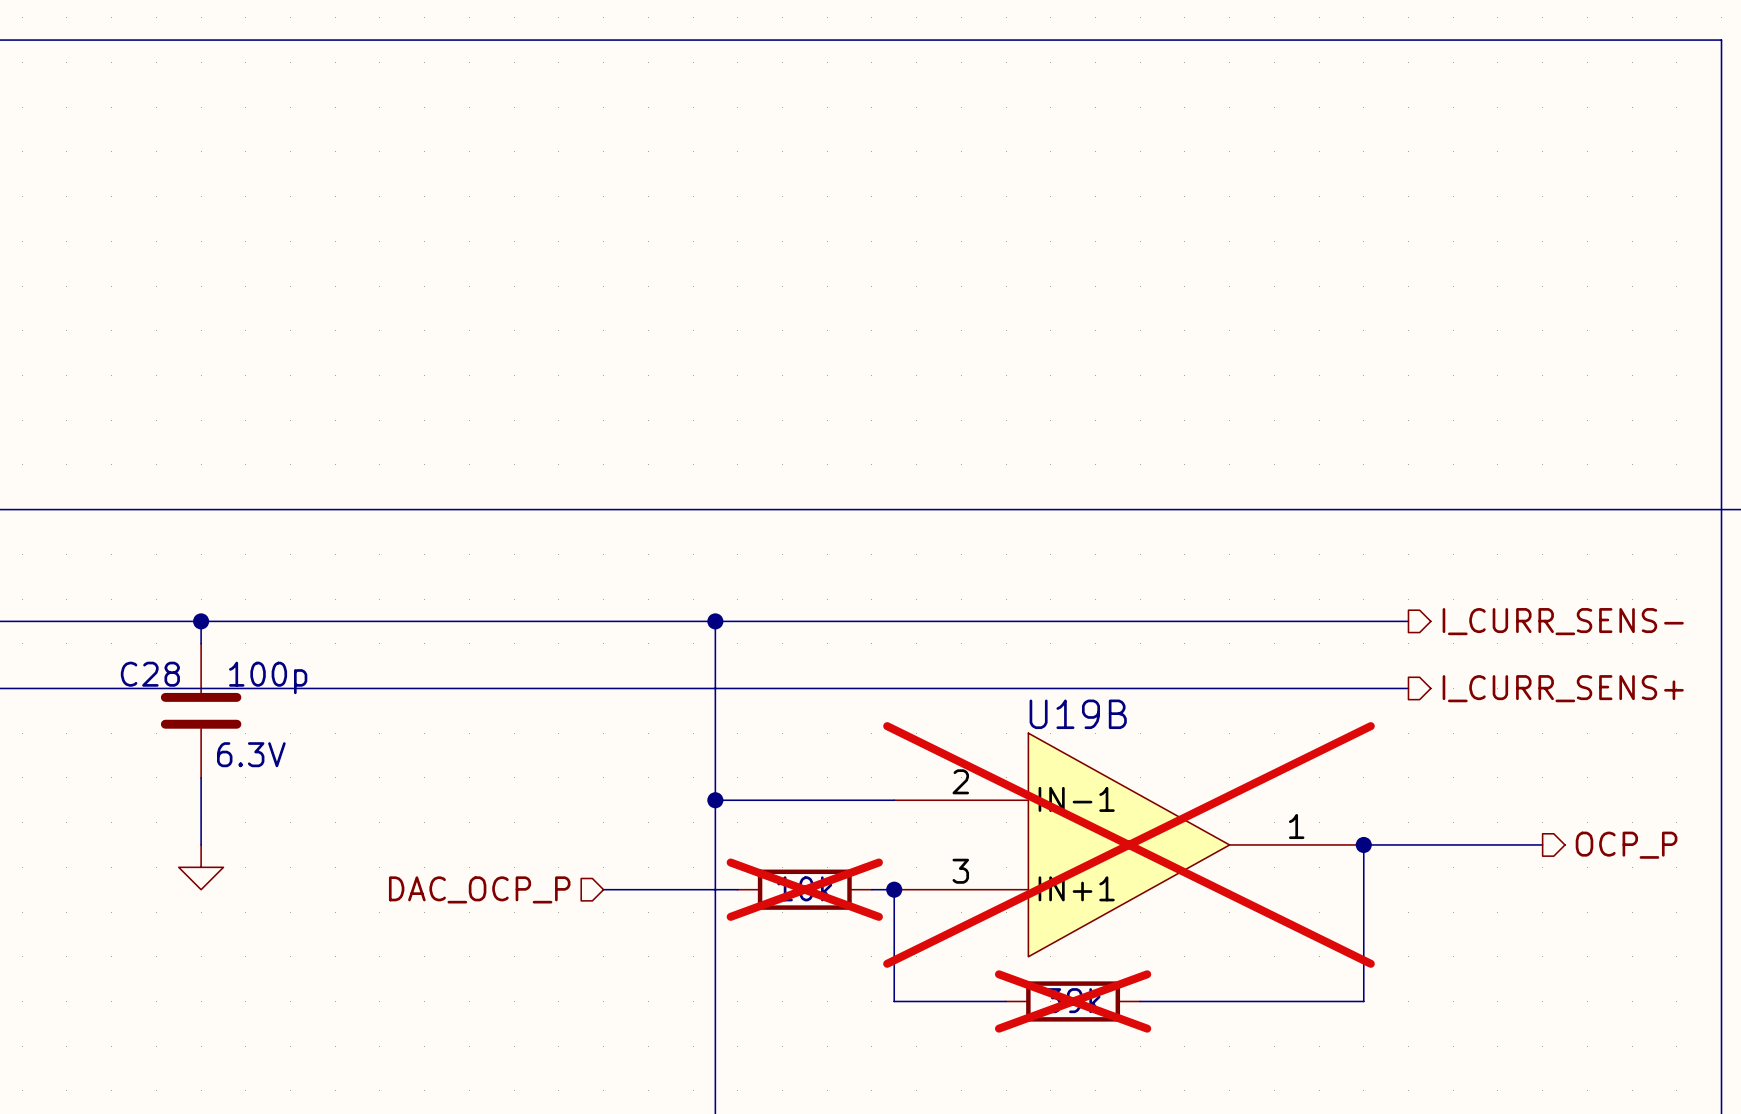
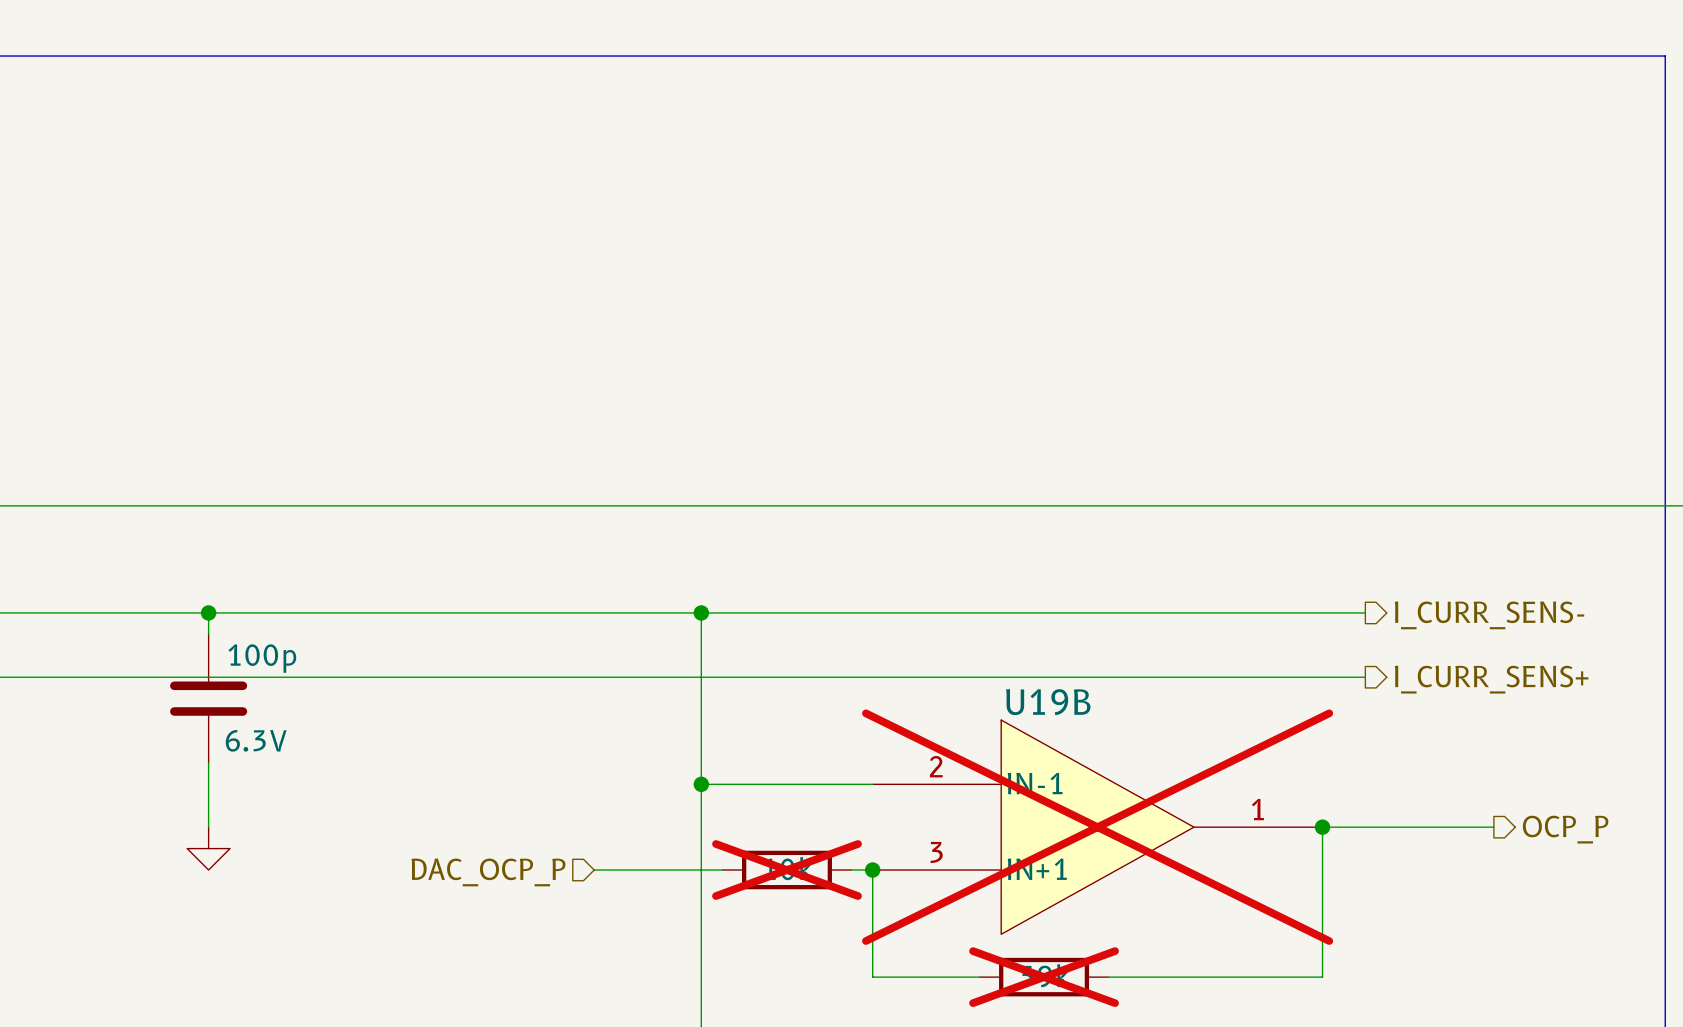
C28 value: none -> 100p (262, 658)
C28 name: C28 (150, 674) -> none
C28 text: 100p (268, 677) -> none

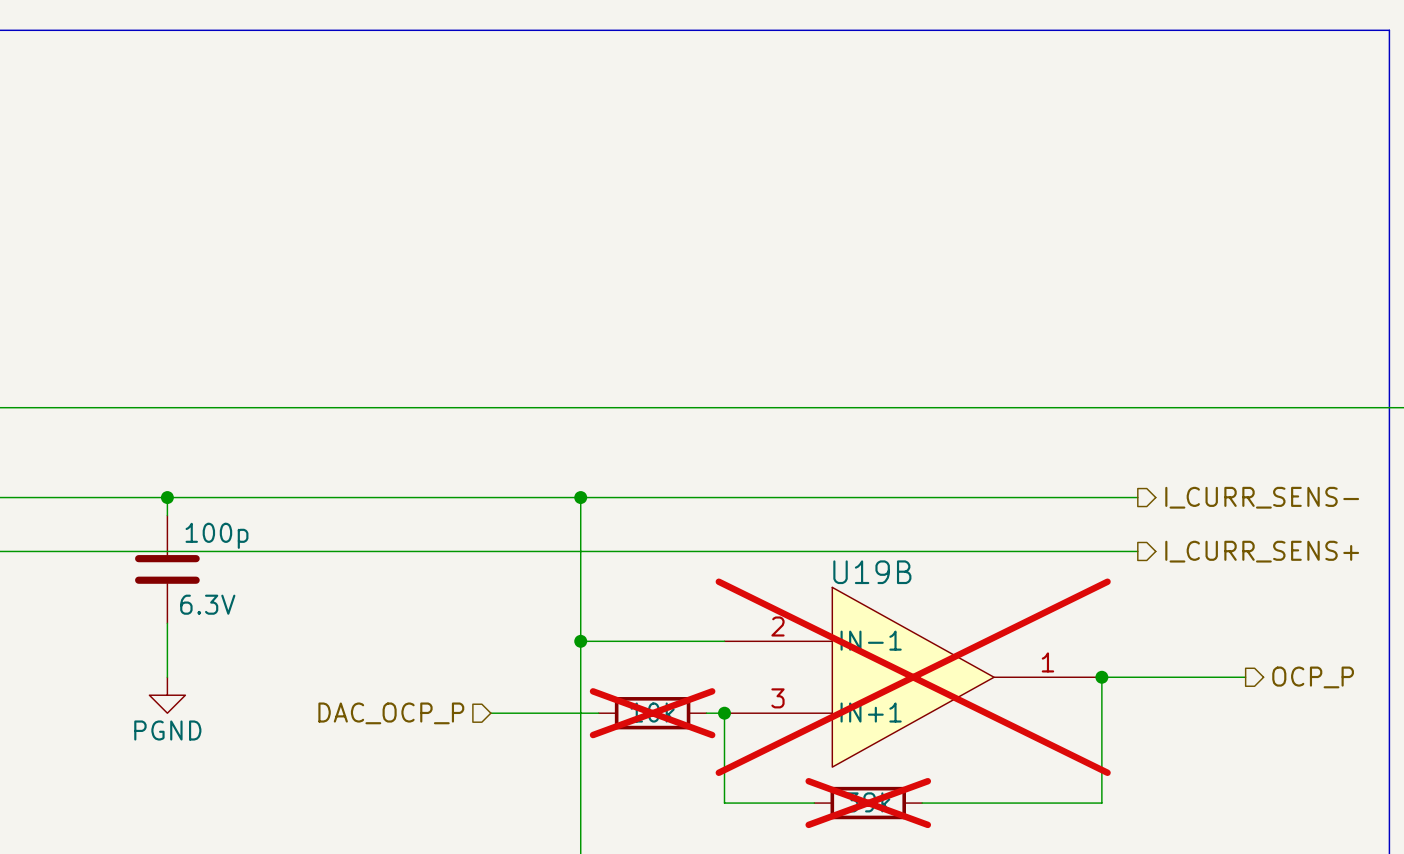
power symbol text: none -> PGND (167, 730)

